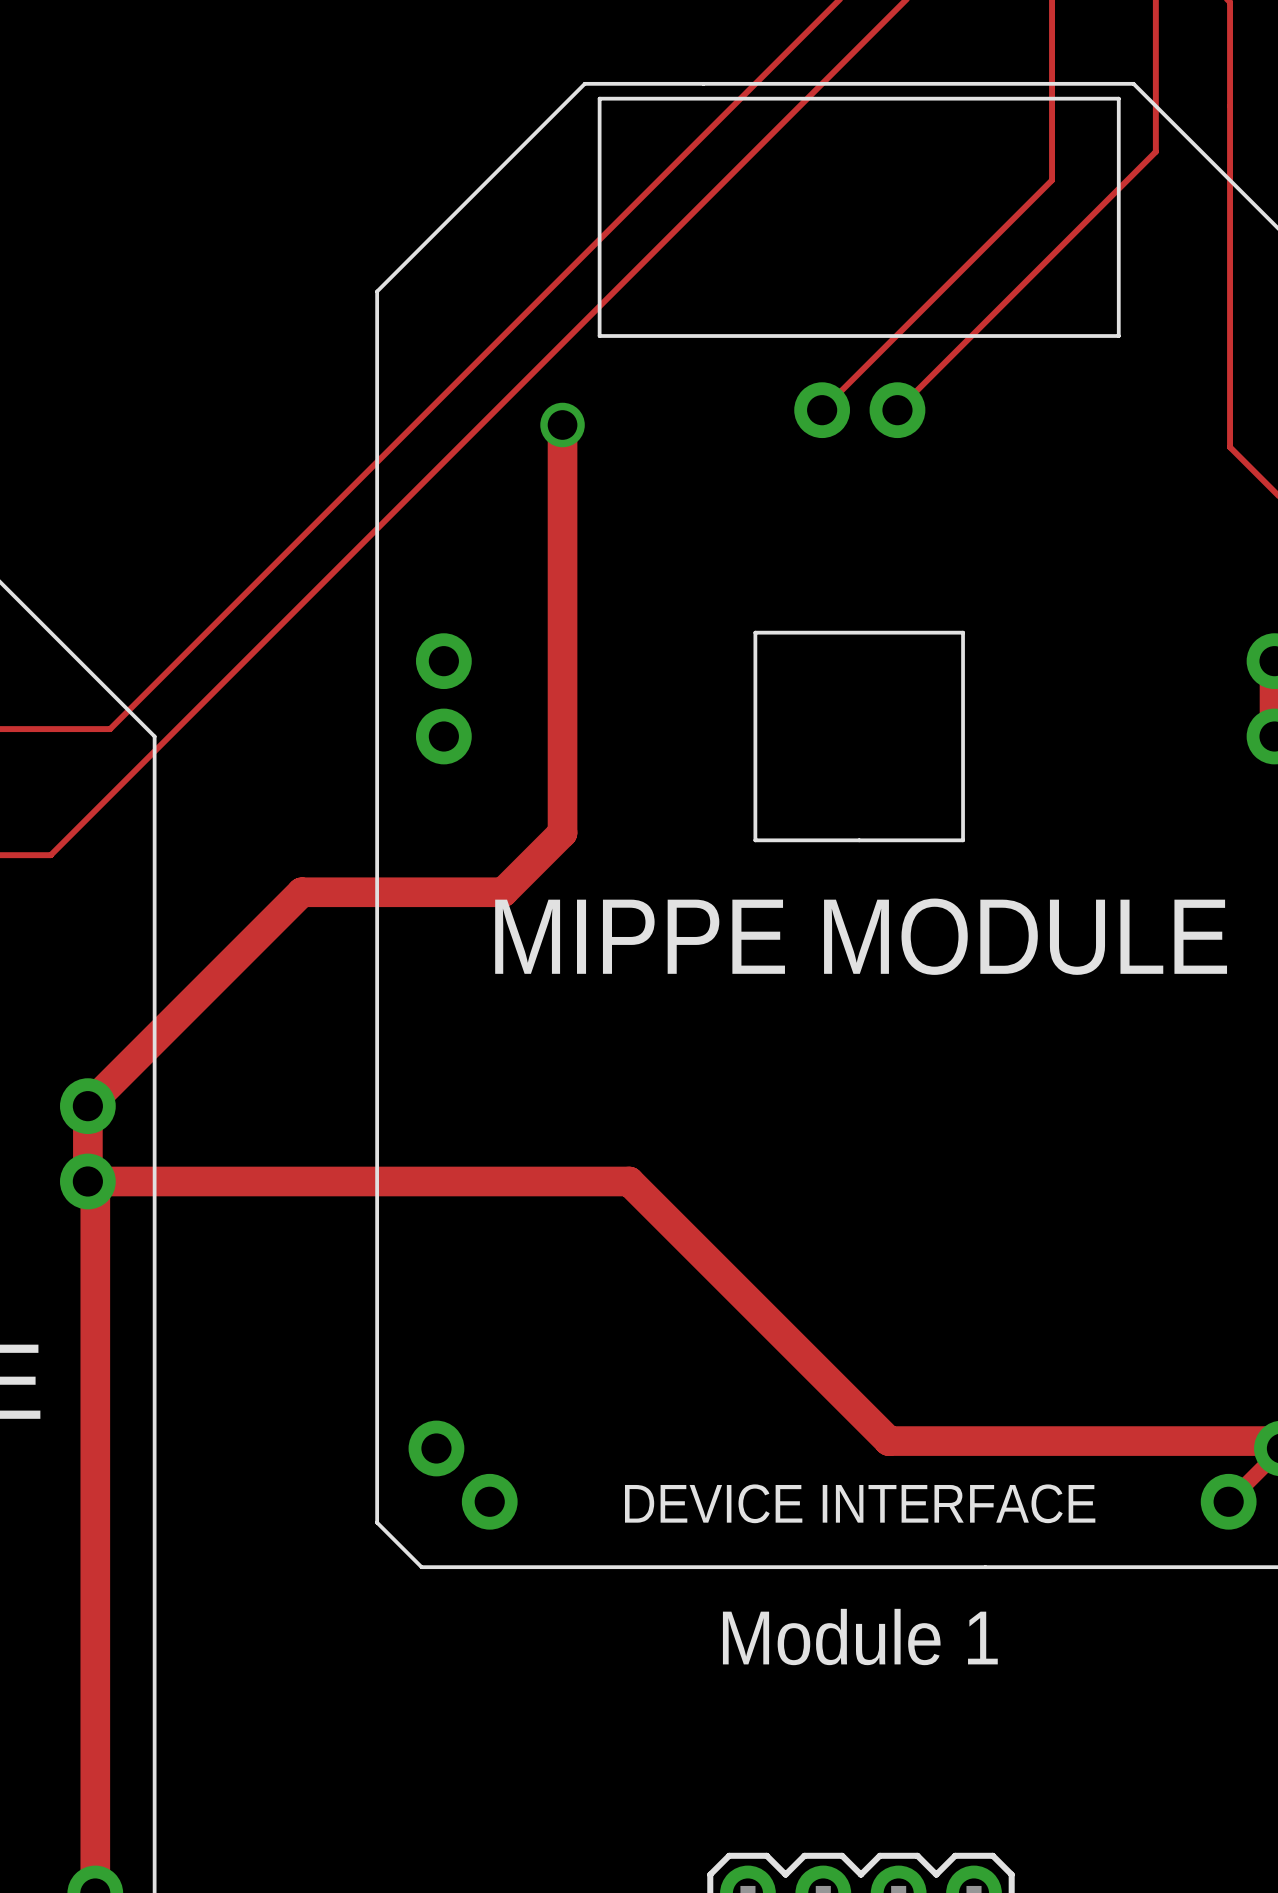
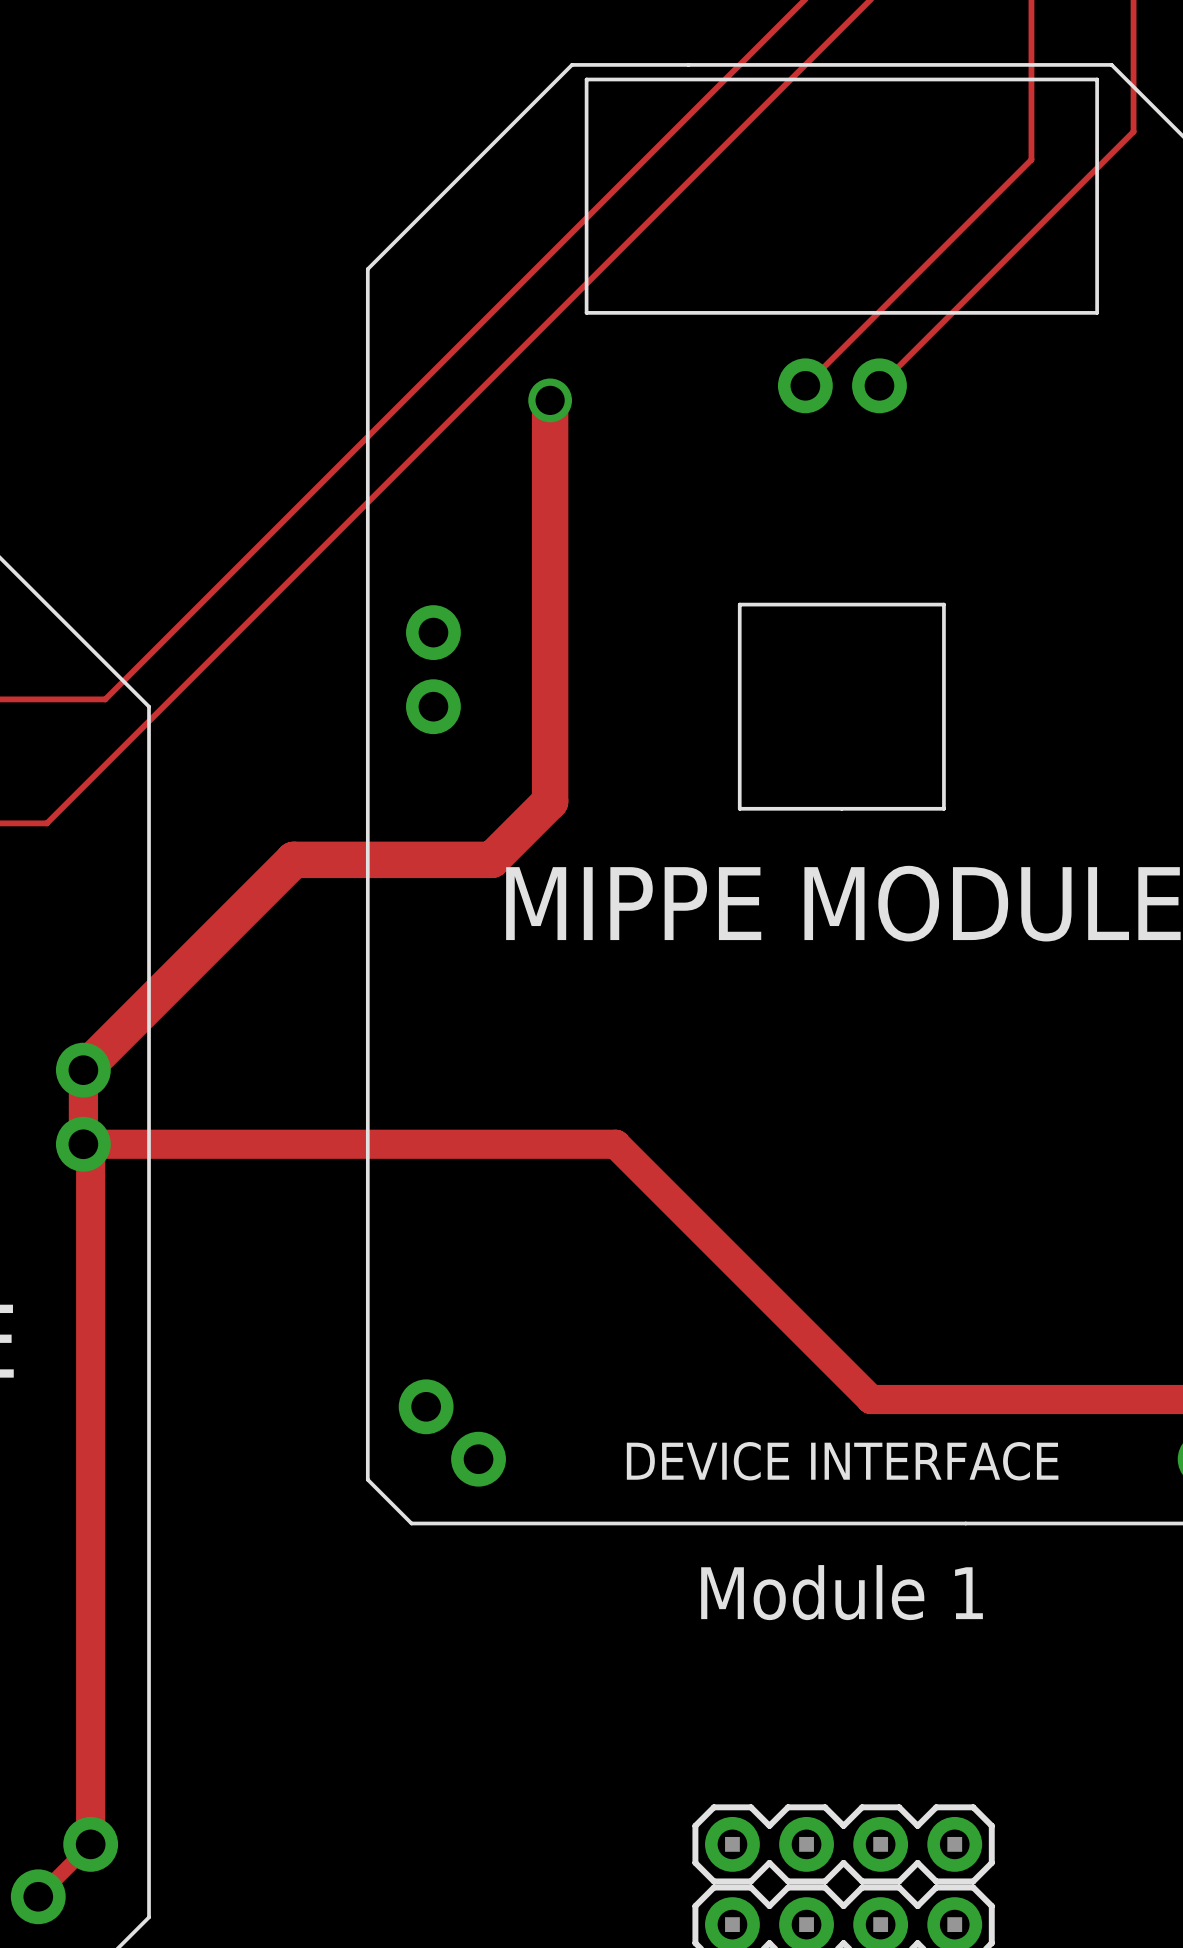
track width: thin (562, 425) (562, 832) (503, 892) (301, 892) (87, 1106) -> thick (550, 400) (550, 801) (491, 859) (293, 859) (83, 1070)

